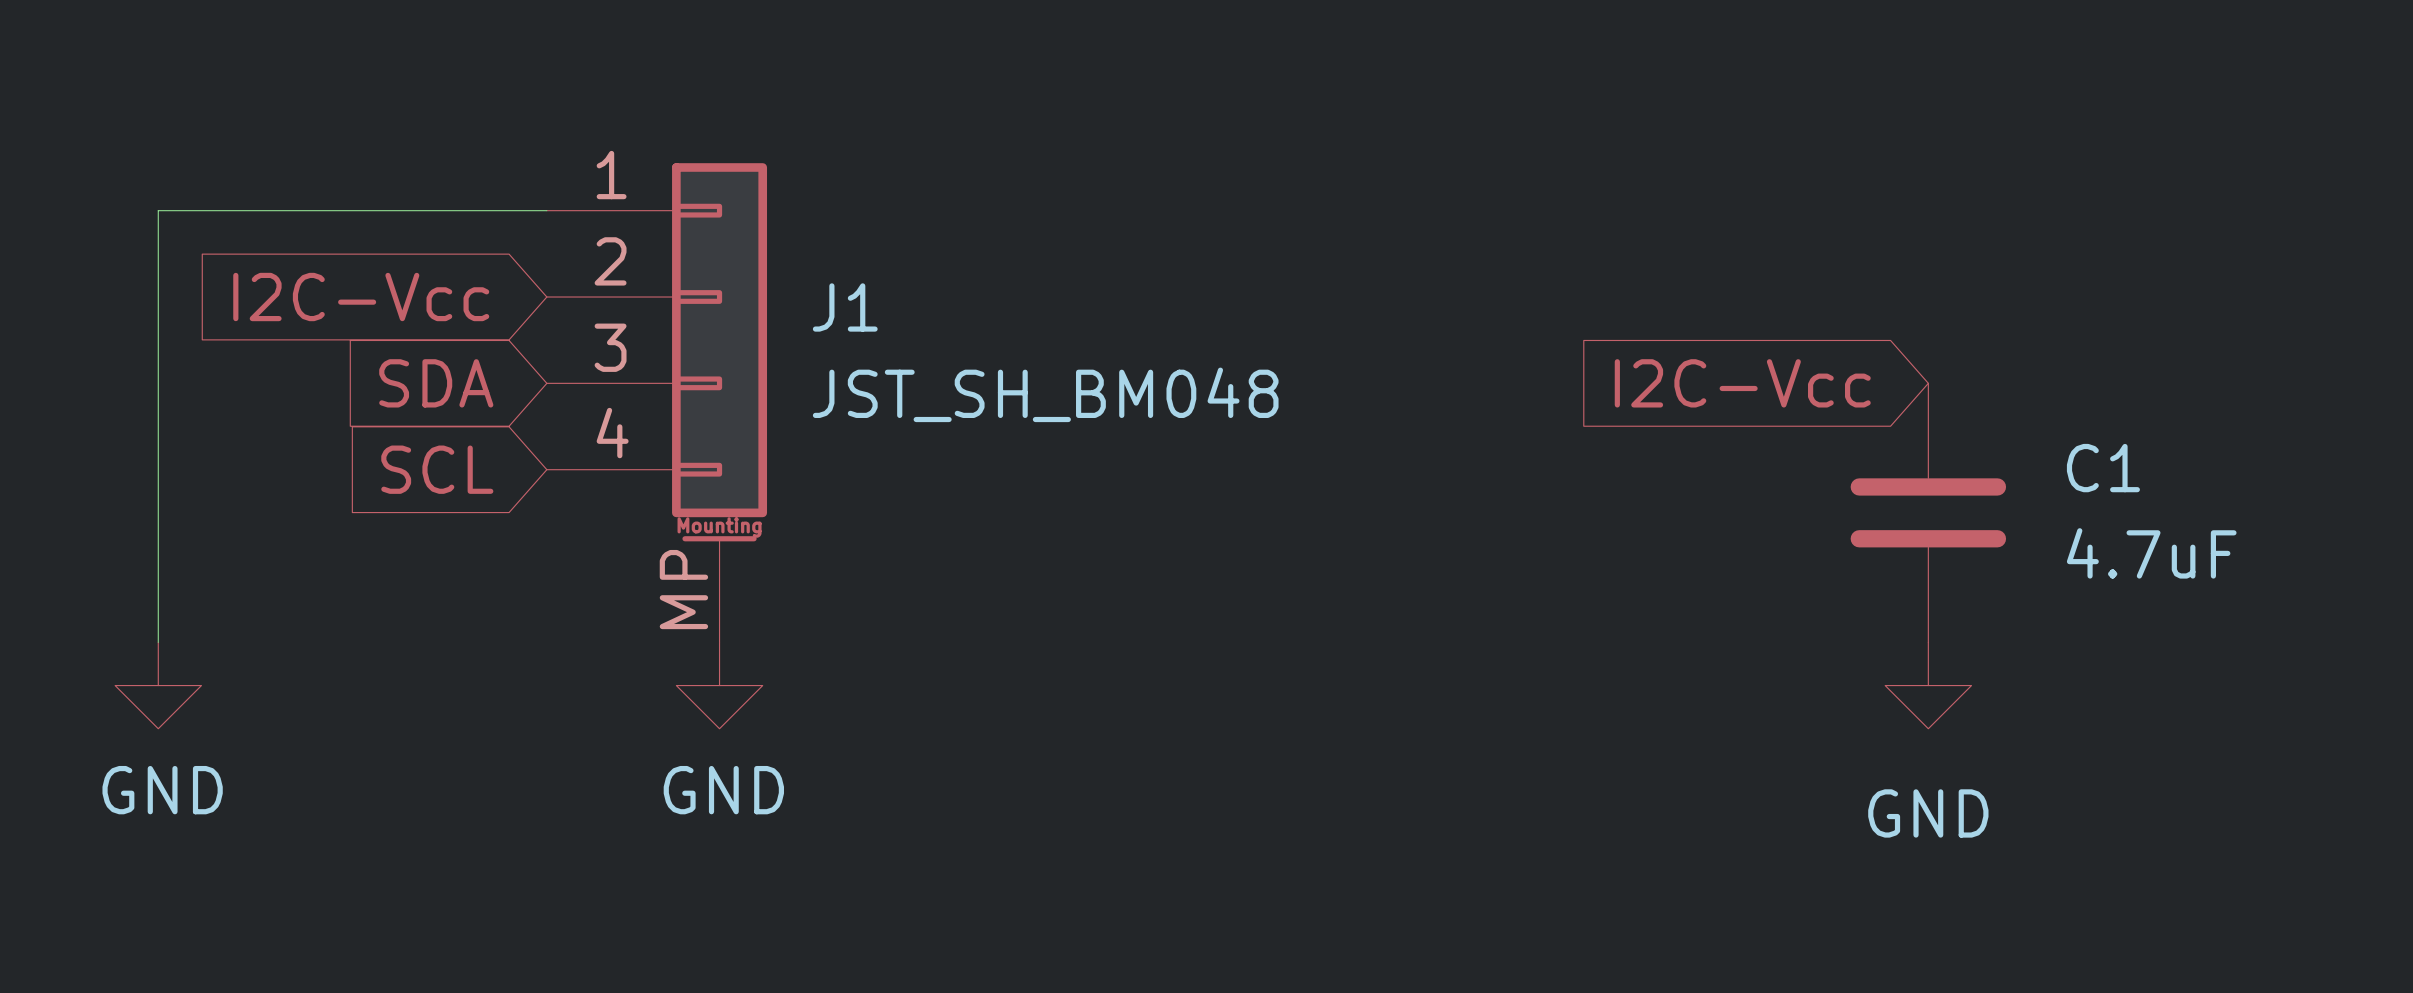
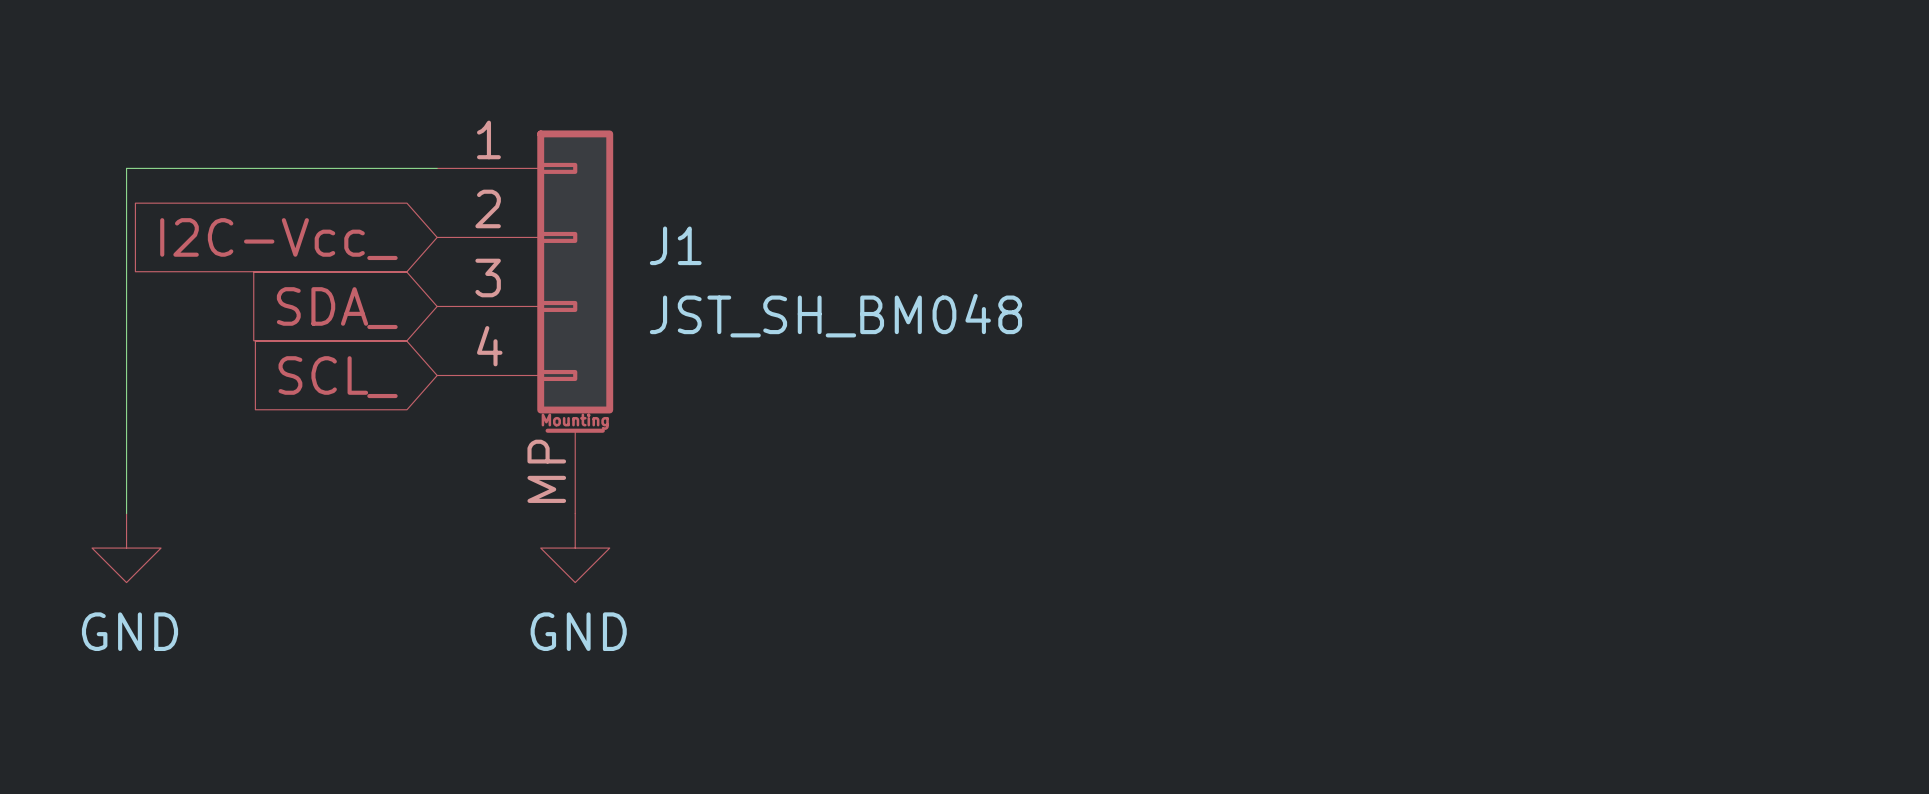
global label: I2C-Vcc (361, 297) -> I2C-Vcc_ (278, 239)
global label: SDA (436, 383) -> SDA_ (337, 308)
global label: I2C-Vcc (1742, 383) -> none
global label: SCL (437, 469) -> SCL_ (338, 377)
C1: 4.7uF (1928, 512) -> none
power symbol: GND (1928, 685) -> none

